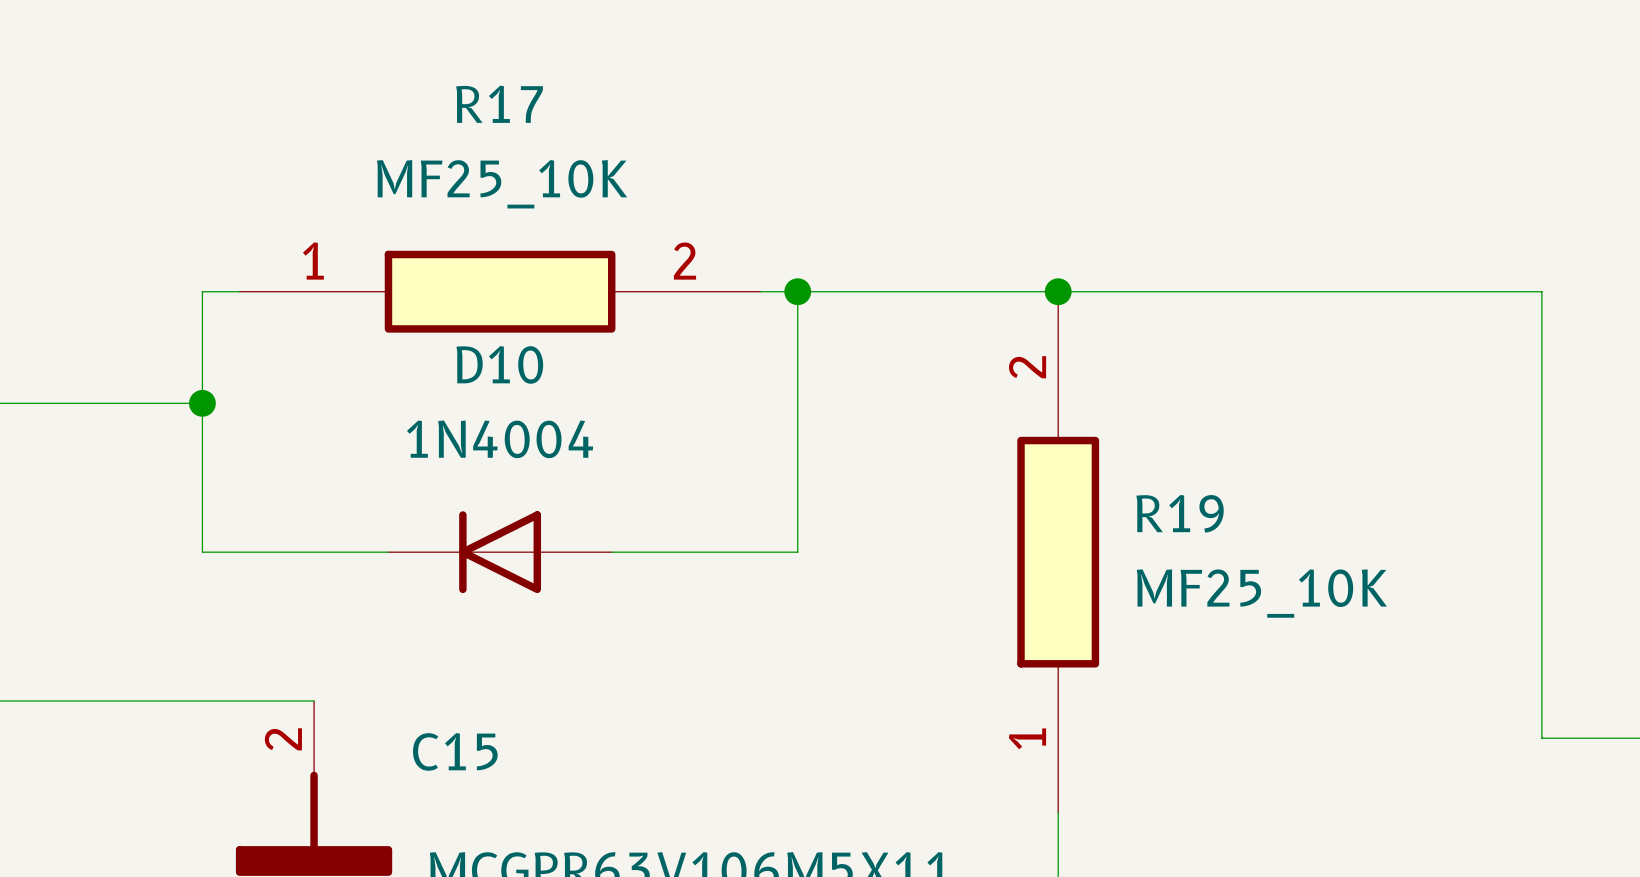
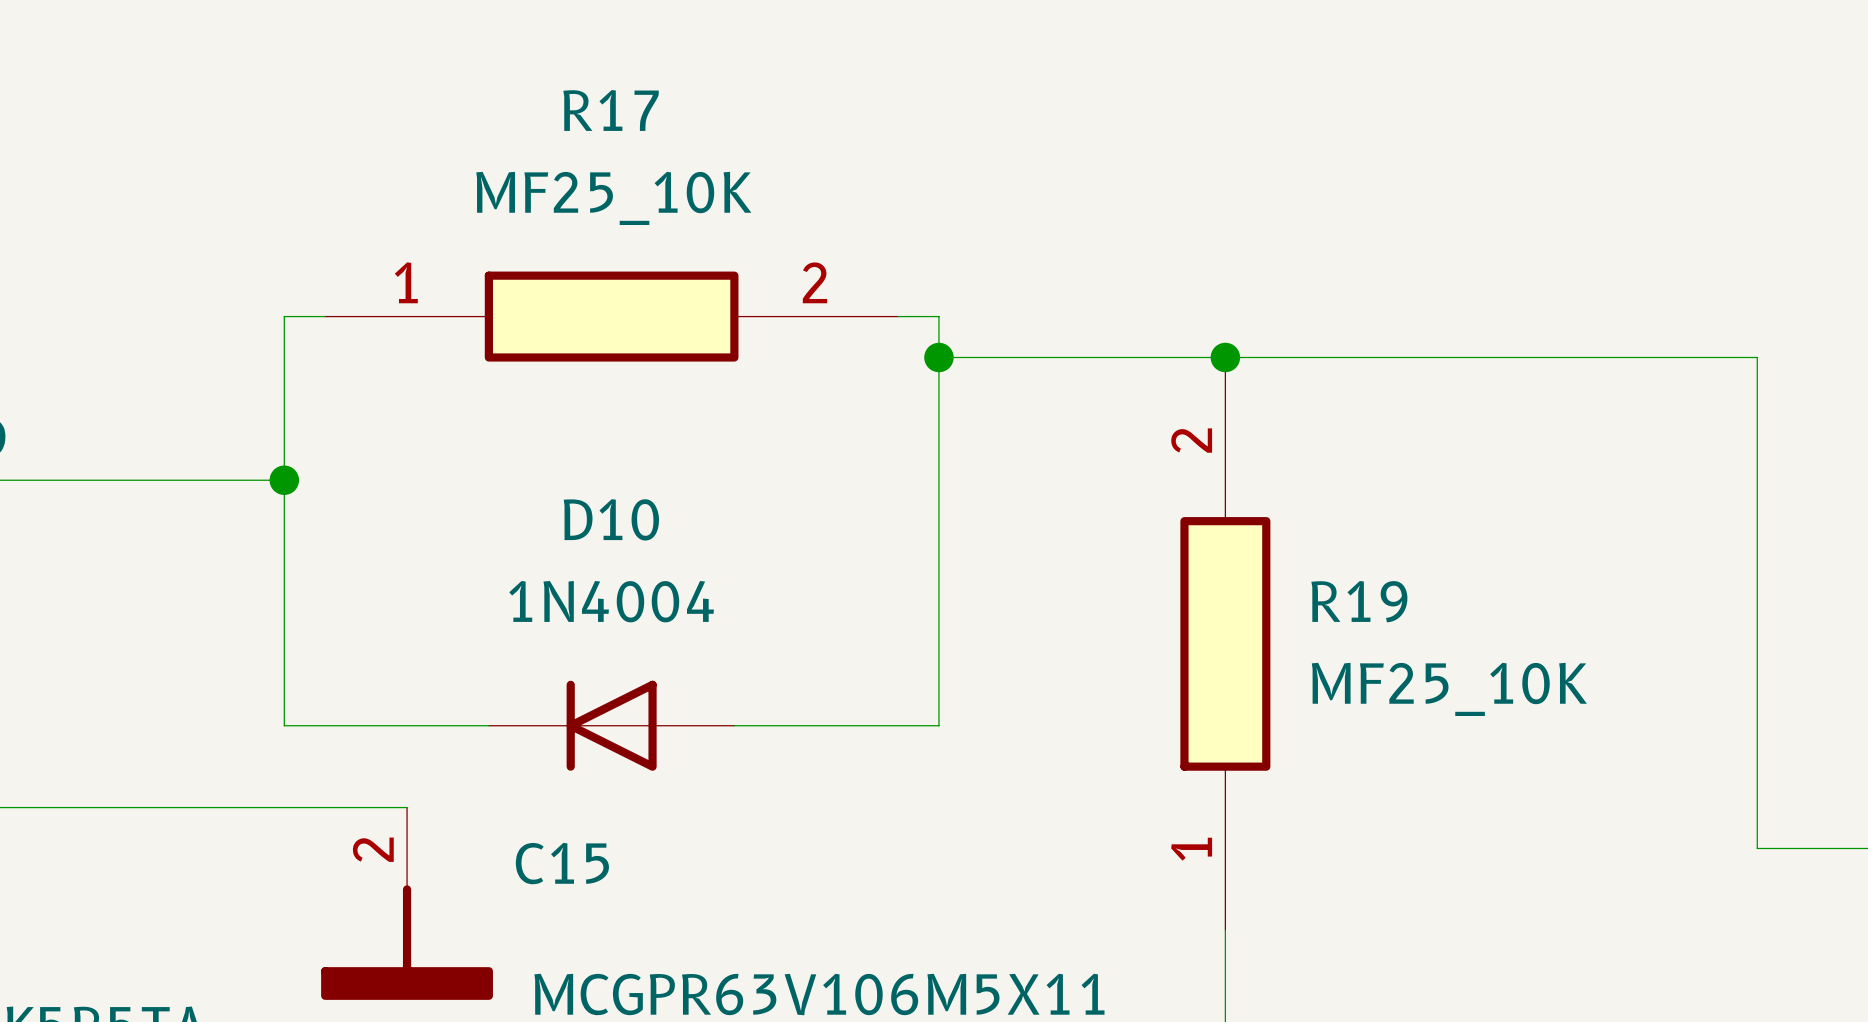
wire: (202, 291) (239, 291) -> (284, 357) (284, 316) (325, 316)
R17 position: (500, 291) -> (611, 316)
wire: (760, 291) (797, 291) -> (898, 316) (938, 316) (938, 357)
wire: (202, 552) (388, 552) -> (284, 643) (284, 725) (488, 725)
D10 position: (500, 552) -> (611, 725)
wire: (611, 552) (797, 552) -> (734, 725) (938, 725) (938, 643)

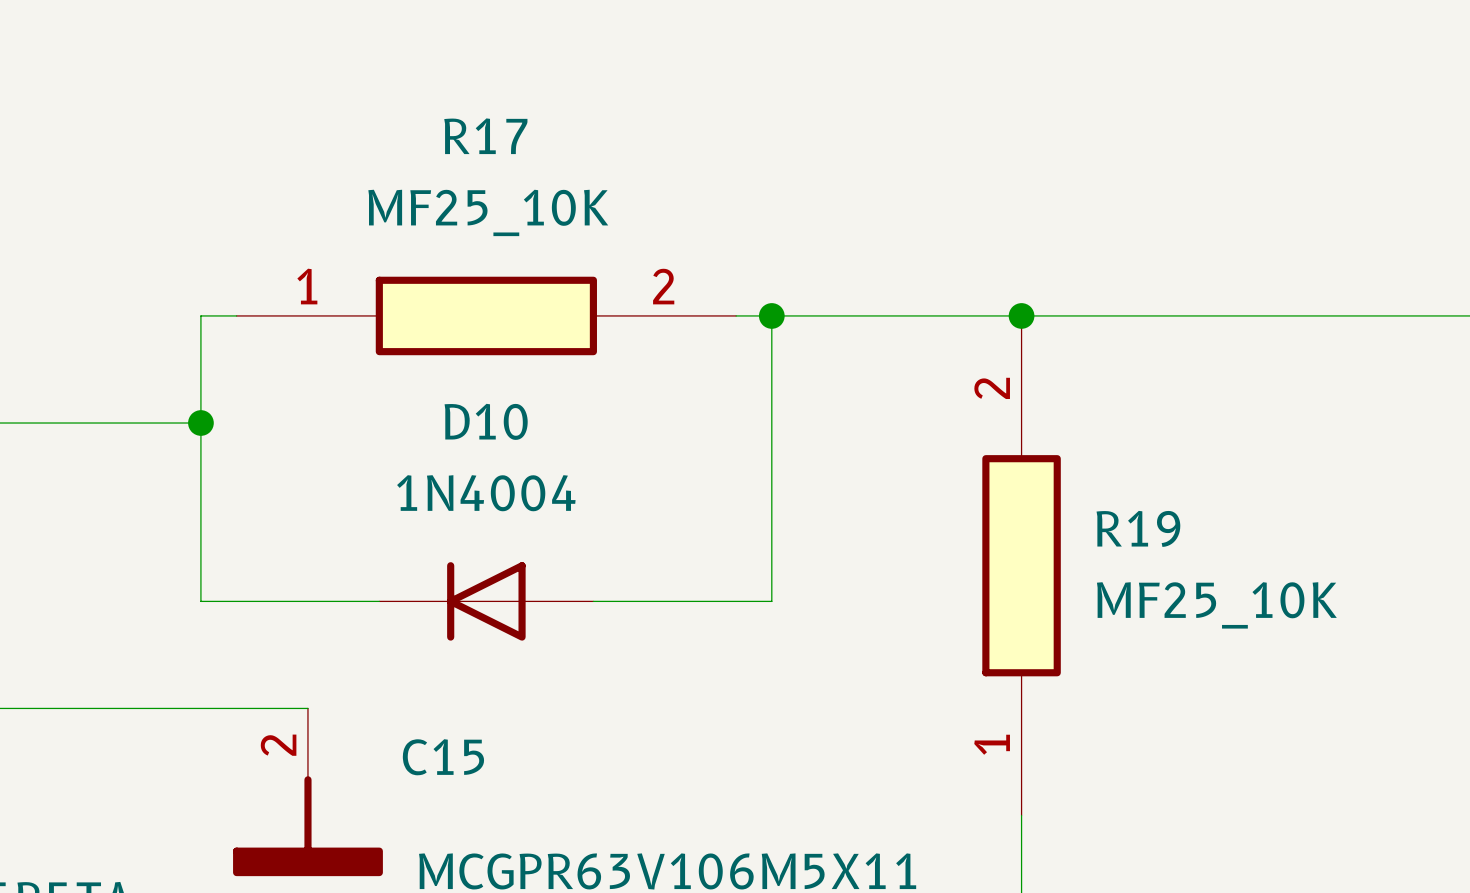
wire: (325, 316) (284, 316) (284, 357) -> (236, 315) (200, 315)
R17 position: (611, 316) -> (486, 315)
wire: (898, 316) (938, 316) (938, 357) -> (736, 315) (771, 315)
wire: (284, 684) (284, 725) (488, 725) -> (200, 601) (379, 601)
wire: (938, 684) (938, 725) (734, 725) -> (771, 601) (593, 601)
D10 position: (611, 725) -> (486, 601)

